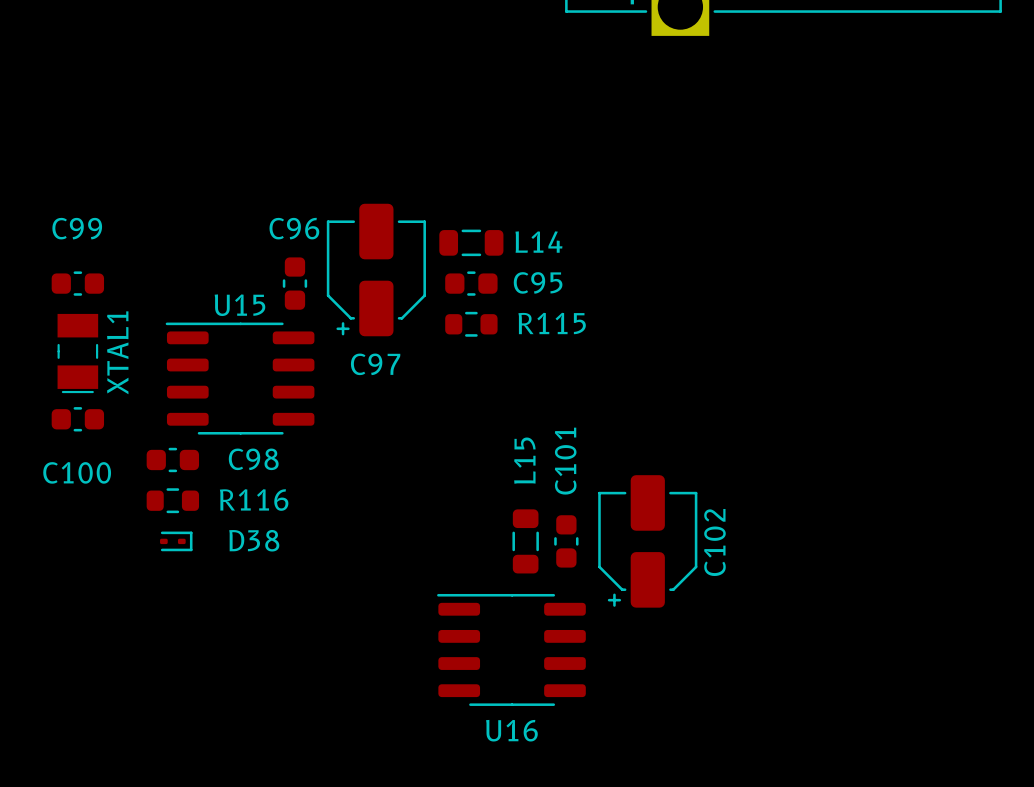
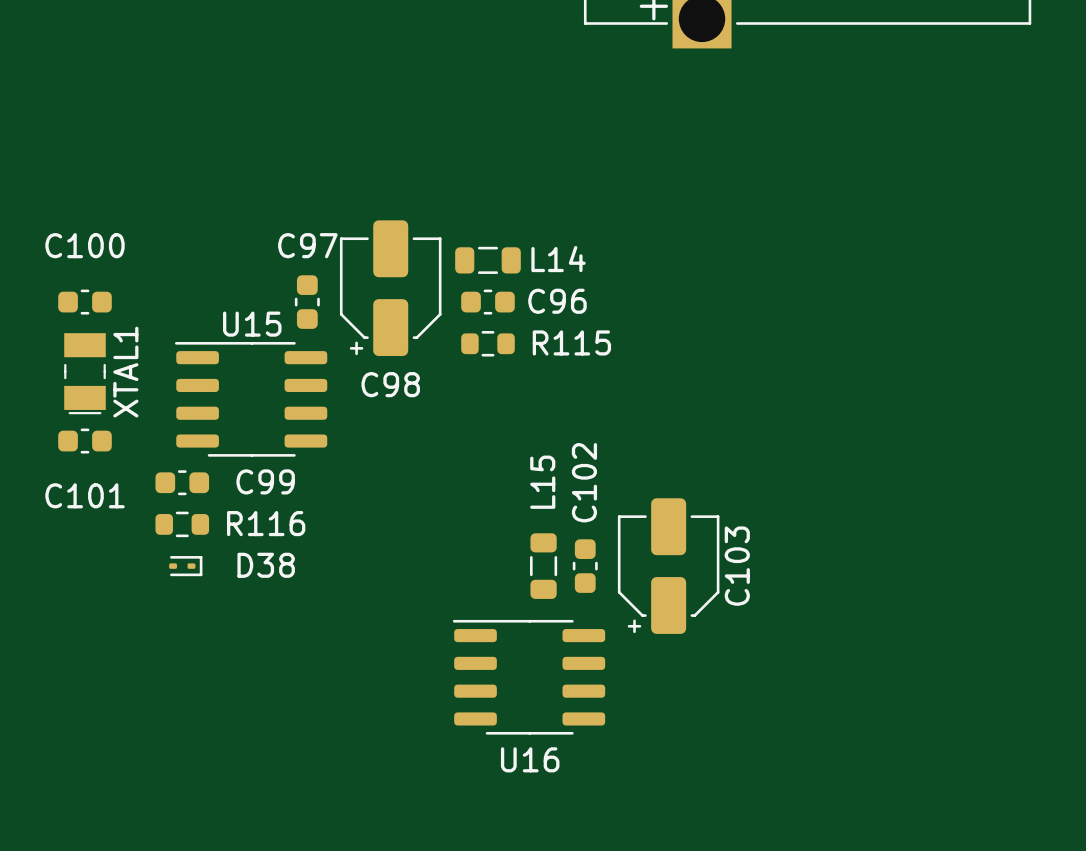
C99 name: C99 (77, 228) -> C100 (85, 245)
C96 name: C96 (294, 228) -> C97 (307, 245)
C95 name: C95 (538, 282) -> C96 (557, 301)
C97 name: C97 (375, 364) -> C98 (390, 384)
C98 name: C98 (253, 459) -> C99 (265, 481)
C101 name: C101 (565, 461) -> C102 (584, 482)
C100 name: C100 (77, 472) -> C101 (85, 495)
C102 name: C102 (714, 542) -> C103 (737, 566)

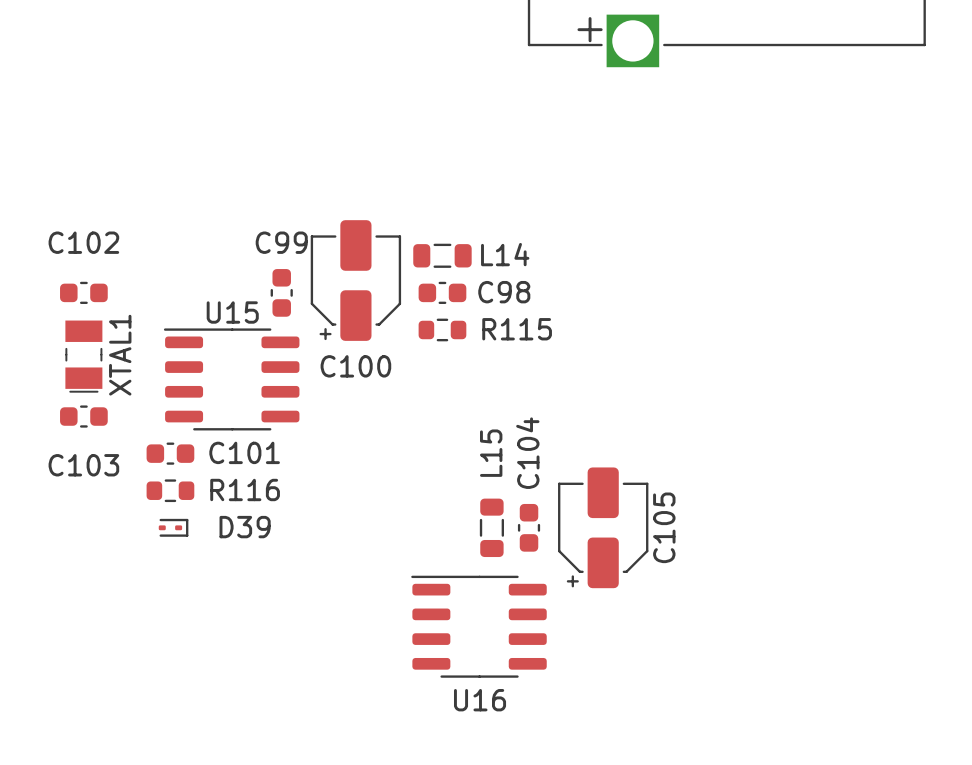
C100 name: C100 (85, 245) -> C102 (83, 242)
C97 name: C97 (307, 245) -> C99 (281, 242)
C96 name: C96 (557, 301) -> C98 (504, 292)
C98 name: C98 (390, 384) -> C100 (355, 366)
C99 name: C99 (265, 481) -> C101 (244, 452)
C102 name: C102 (584, 482) -> C104 (527, 453)
C101 name: C101 (85, 495) -> C103 (83, 465)
D38 name: D38 (266, 565) -> D39 (245, 527)
C103 name: C103 (737, 566) -> C105 (664, 527)

